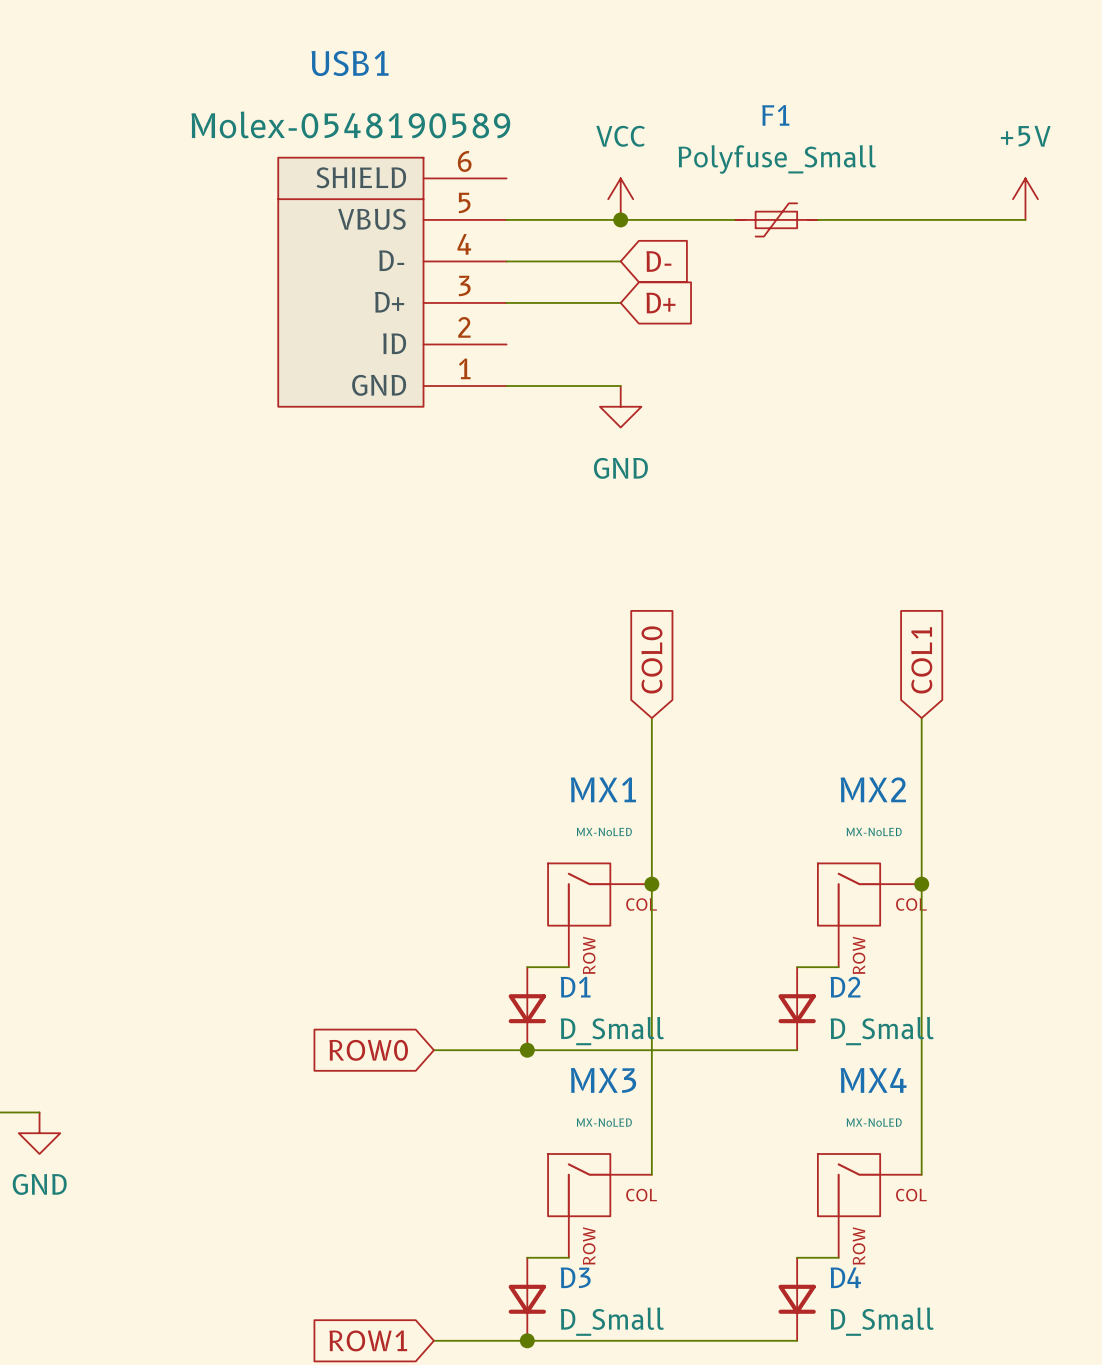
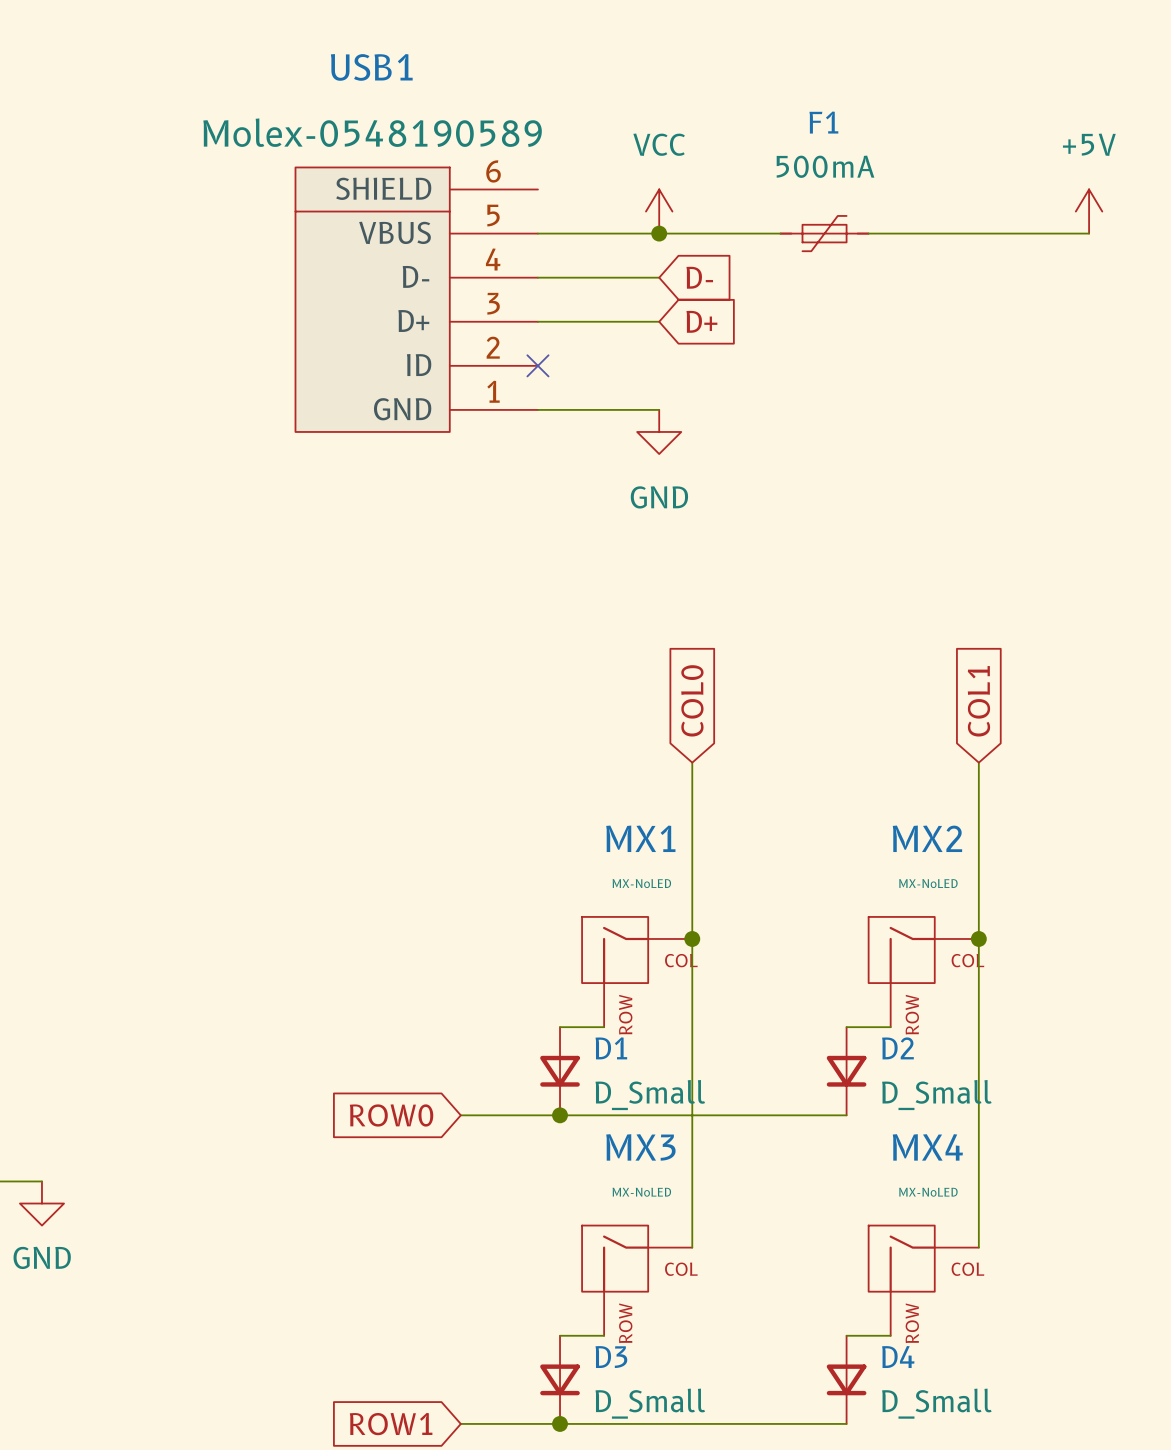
F1 value: Polyfuse_Small (777, 159) -> 500mA (825, 166)
no-connect mark: none -> (537, 365)

